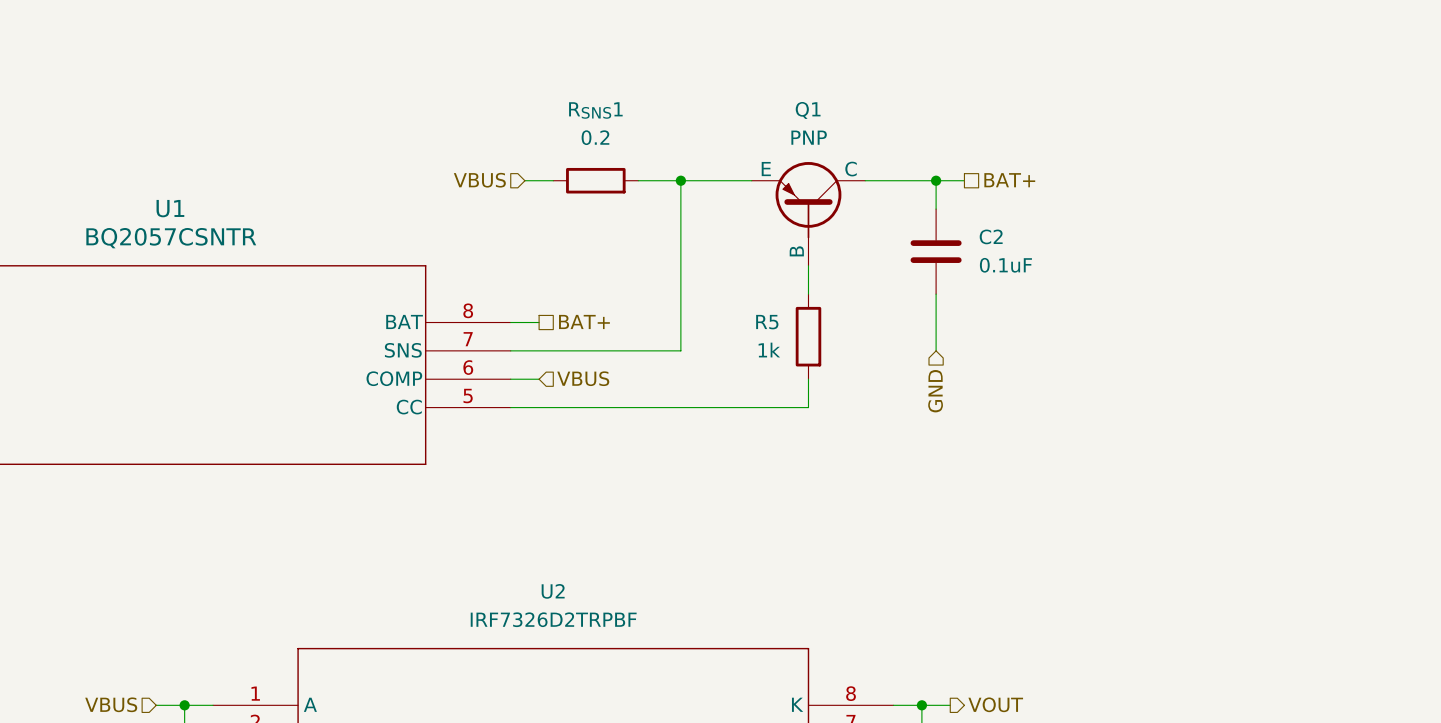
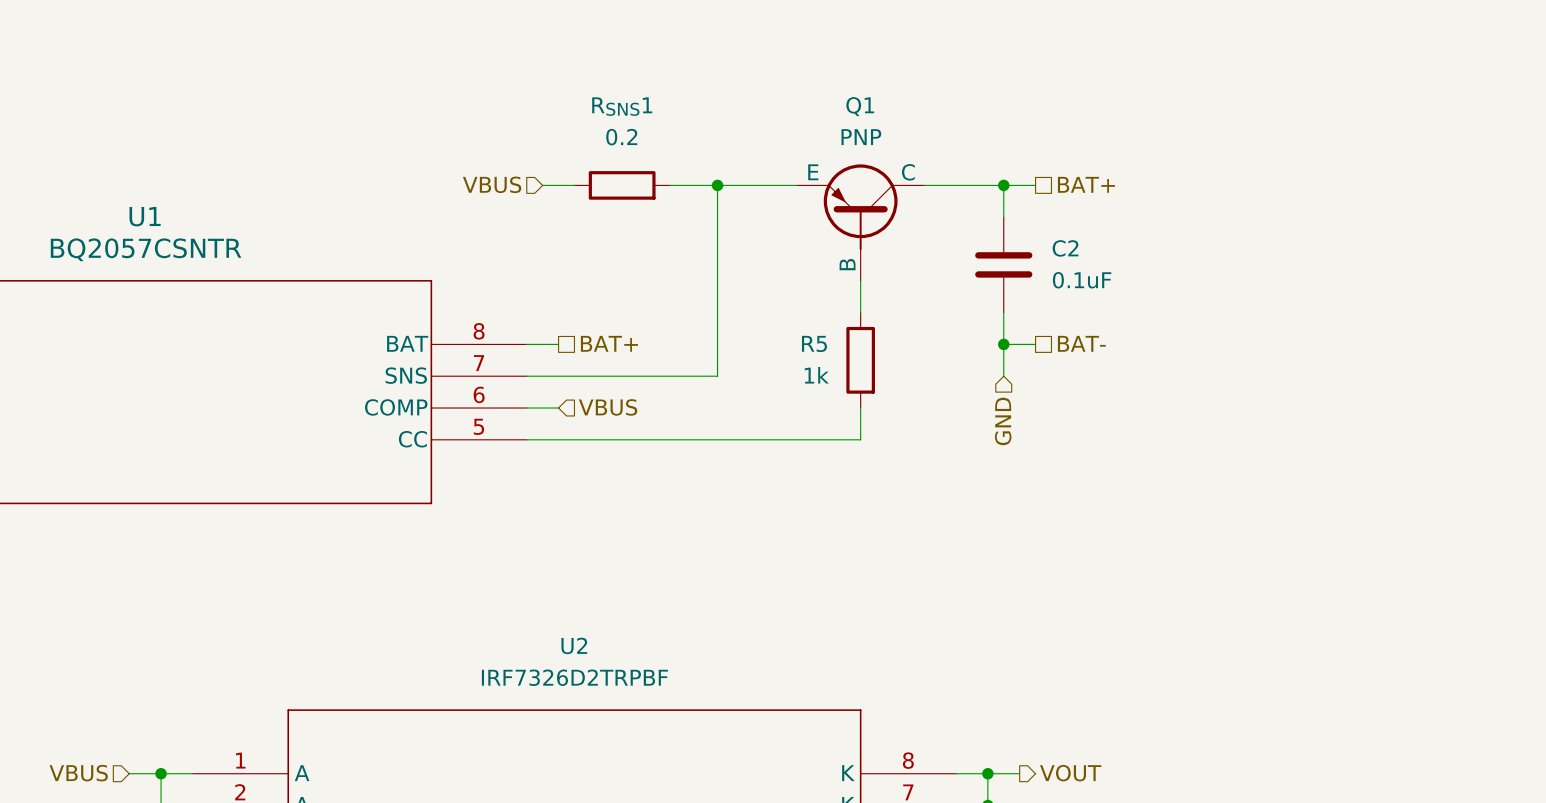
hierarchical label: none -> BAT- (1081, 343)
wire: none -> (1003, 344) (1035, 344)
junction: none -> (1003, 344)

